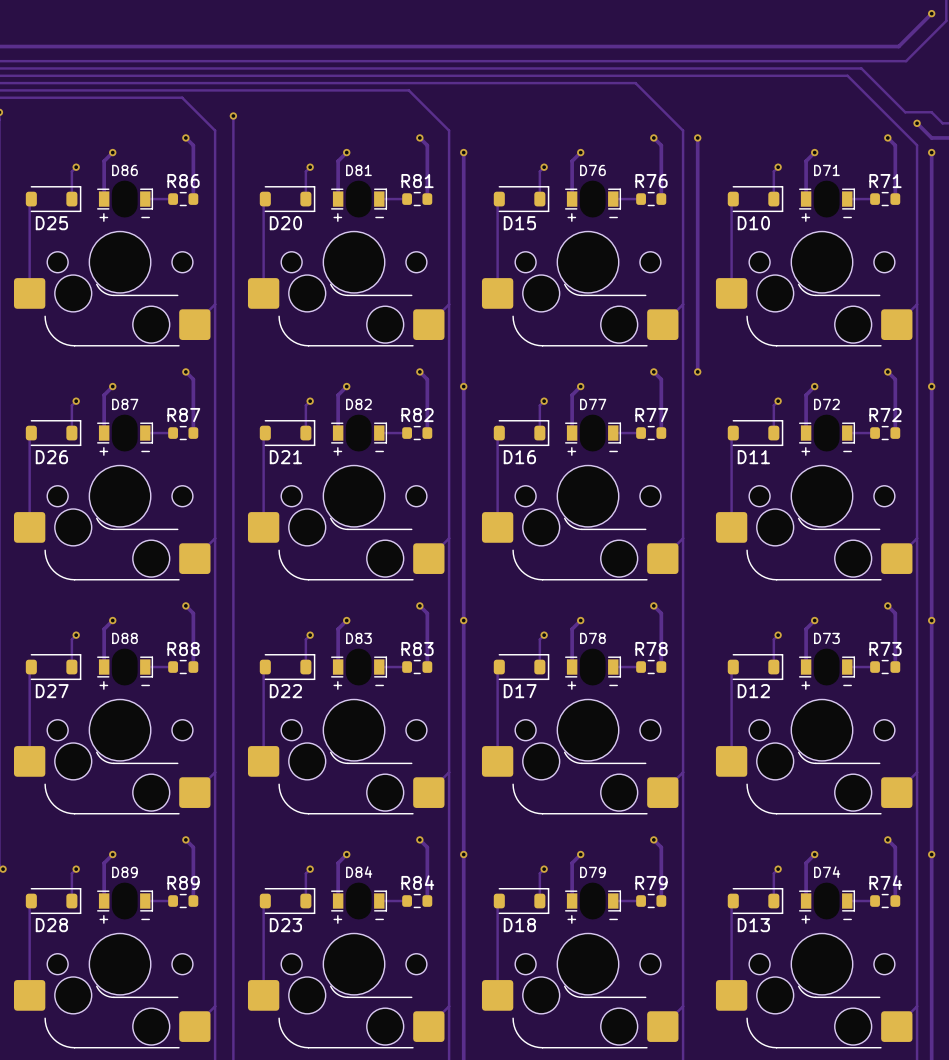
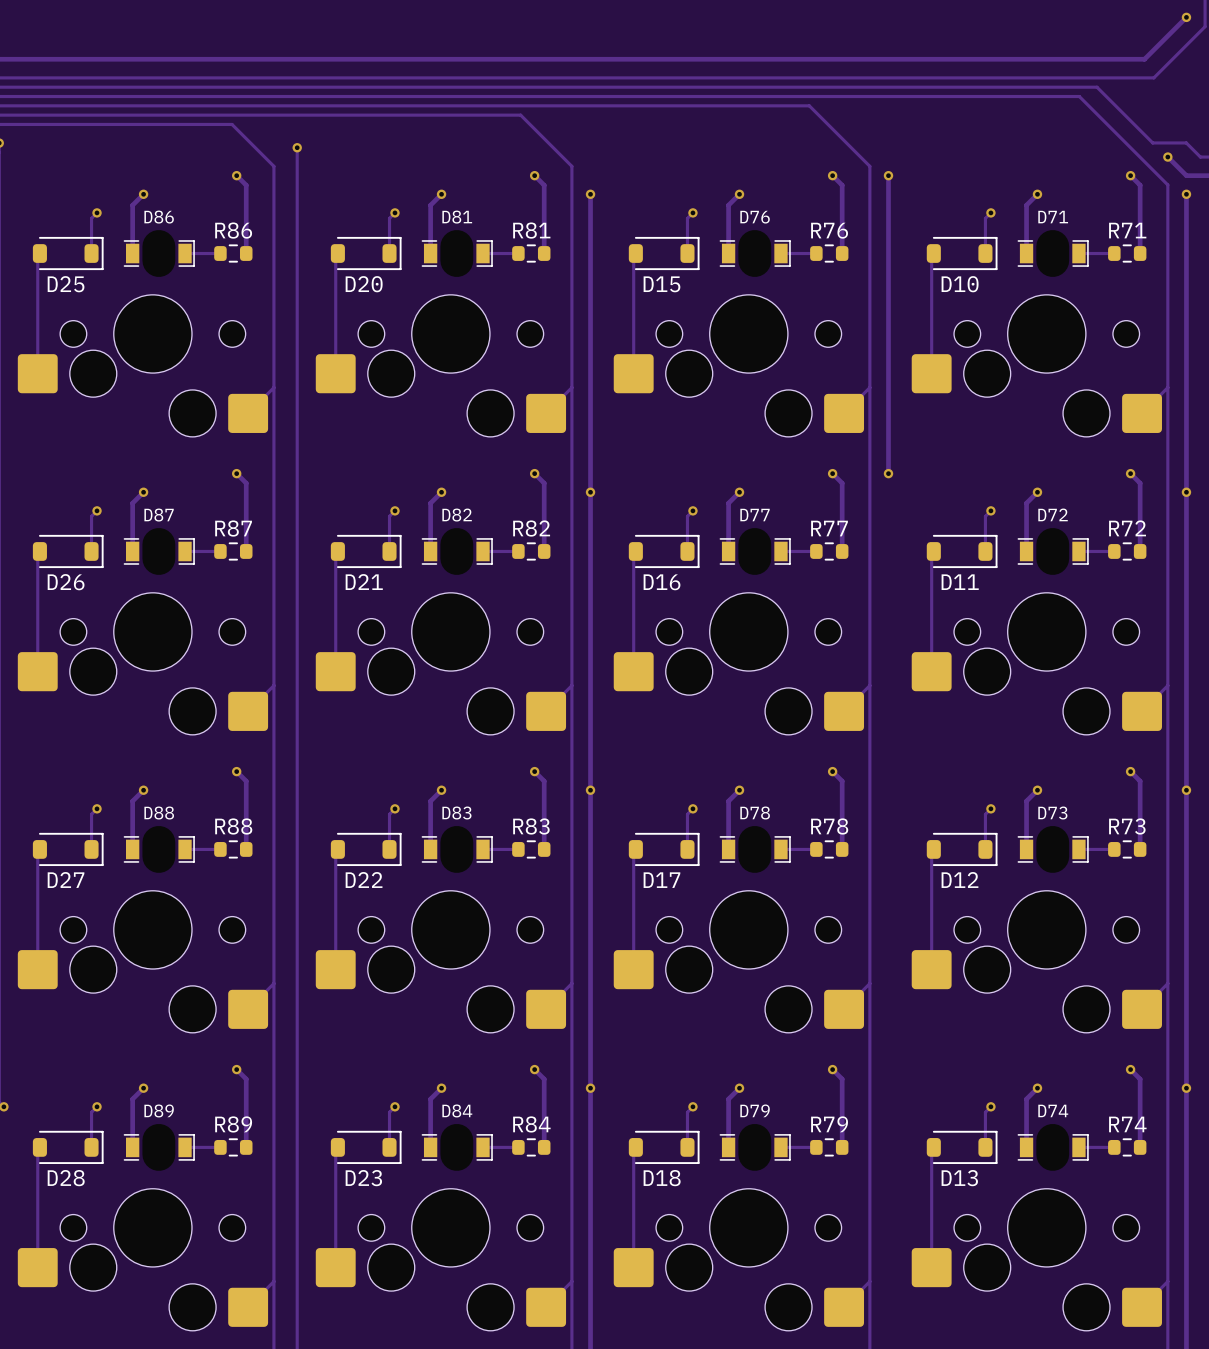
D86 footprint: [97, 180, 153, 222] -> [123, 230, 195, 277]
D81 footprint: [331, 180, 387, 222] -> [421, 230, 493, 277]
D76 footprint: [565, 180, 621, 222] -> [719, 230, 791, 277]
D71 footprint: [799, 180, 855, 222] -> [1017, 230, 1089, 277]
part footprint: [13, 231, 211, 347] -> [17, 294, 269, 437]
part footprint: [247, 231, 445, 347] -> [315, 294, 567, 437]
part footprint: [481, 231, 679, 347] -> [613, 294, 865, 437]
part footprint: [715, 231, 913, 347] -> [911, 294, 1162, 437]
D87 footprint: [97, 414, 153, 456] -> [123, 528, 195, 575]
D82 footprint: [331, 414, 387, 456] -> [421, 528, 493, 575]
D77 footprint: [565, 414, 621, 456] -> [719, 528, 791, 575]
D72 footprint: [799, 414, 855, 456] -> [1017, 528, 1089, 575]
part footprint: [13, 465, 211, 581] -> [17, 592, 269, 735]
part footprint: [247, 465, 445, 581] -> [315, 592, 567, 735]
part footprint: [481, 465, 679, 581] -> [613, 592, 865, 735]
part footprint: [715, 465, 913, 581] -> [911, 592, 1162, 735]
D88 footprint: [97, 648, 153, 690] -> [123, 825, 195, 873]
D83 footprint: [331, 648, 387, 690] -> [421, 825, 493, 873]
D78 footprint: [565, 648, 621, 690] -> [719, 825, 791, 873]
D73 footprint: [799, 648, 855, 690] -> [1017, 825, 1089, 873]
part footprint: [13, 699, 211, 815] -> [17, 890, 269, 1033]
part footprint: [247, 699, 445, 815] -> [315, 890, 567, 1033]
part footprint: [481, 699, 679, 815] -> [613, 890, 865, 1033]
part footprint: [715, 699, 913, 815] -> [911, 890, 1162, 1033]
D89 footprint: [97, 882, 153, 924] -> [123, 1123, 195, 1171]
D84 footprint: [331, 882, 387, 924] -> [421, 1123, 493, 1171]
D79 footprint: [565, 882, 621, 924] -> [719, 1123, 791, 1171]
D74 footprint: [799, 882, 855, 924] -> [1017, 1123, 1089, 1171]
part footprint: [13, 933, 211, 1049] -> [17, 1188, 269, 1331]
part footprint: [247, 933, 445, 1049] -> [315, 1188, 567, 1331]
part footprint: [481, 933, 679, 1049] -> [613, 1188, 865, 1331]
part footprint: [715, 933, 913, 1049] -> [911, 1188, 1162, 1331]

